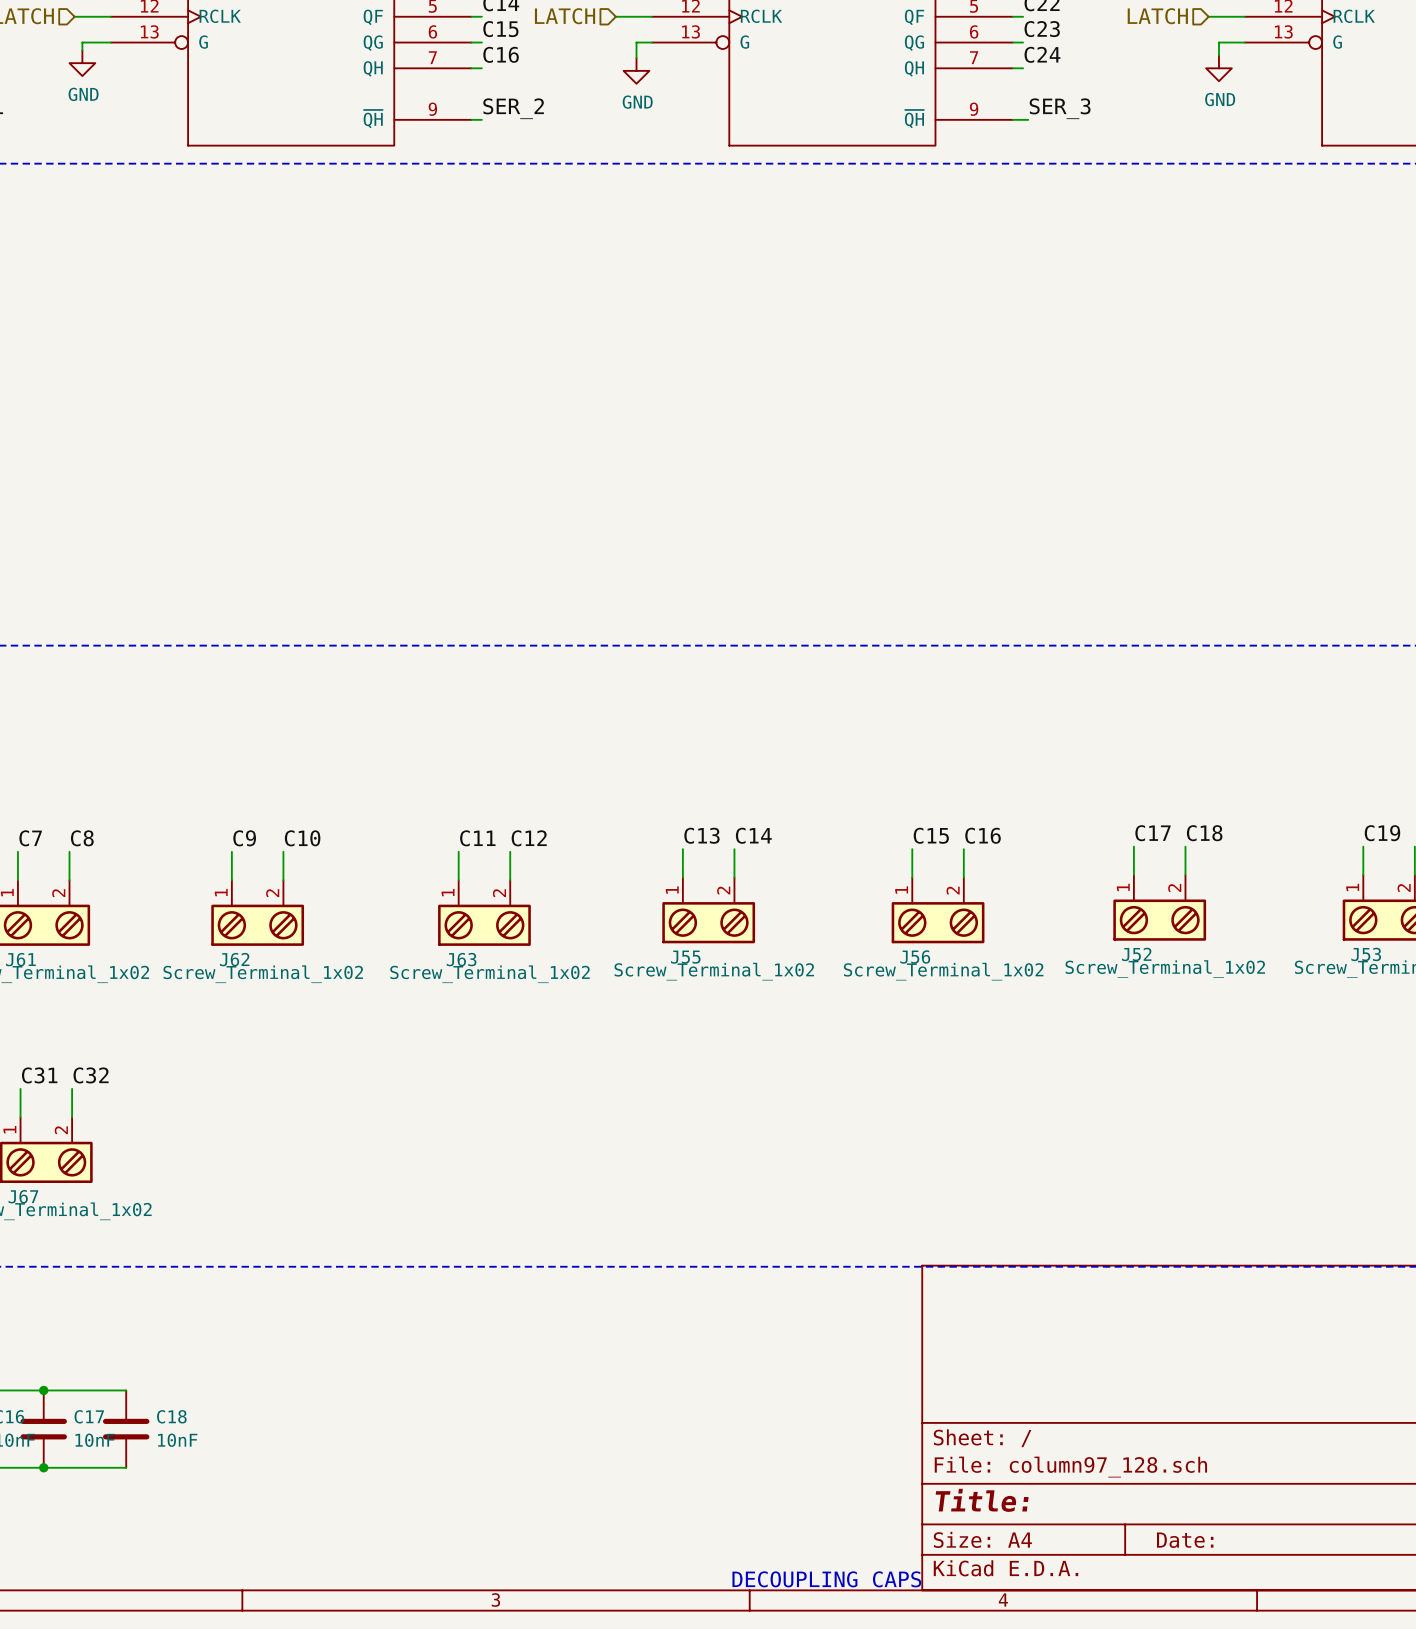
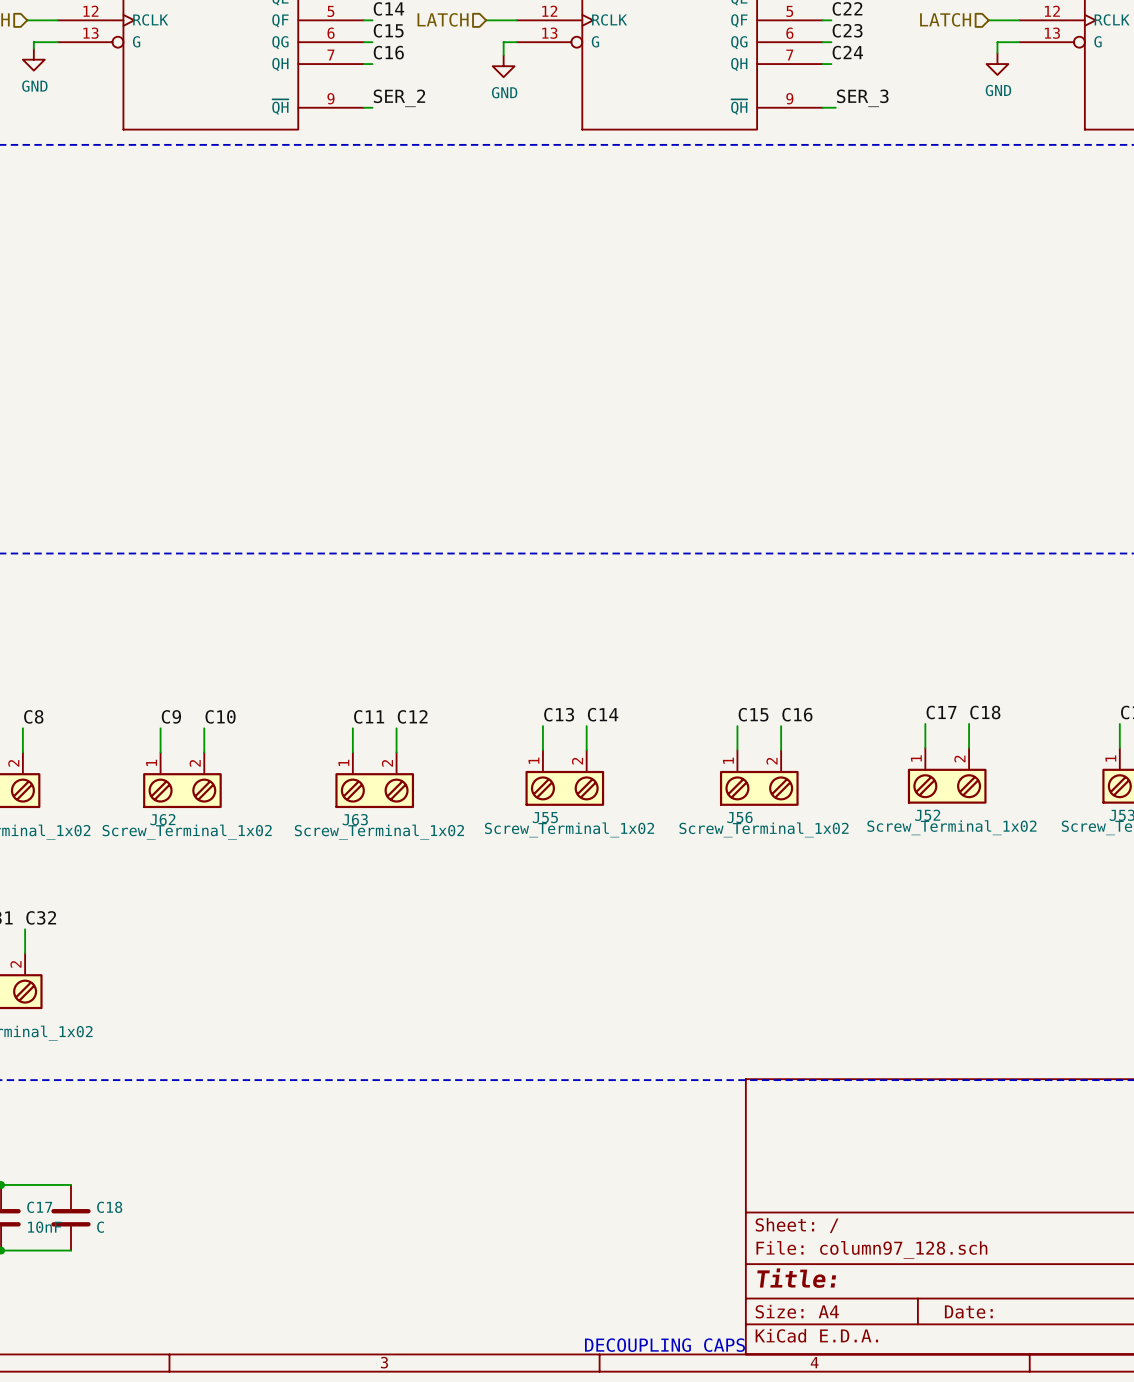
C18 value: 10nF (177, 1440) -> C (100, 1227)

